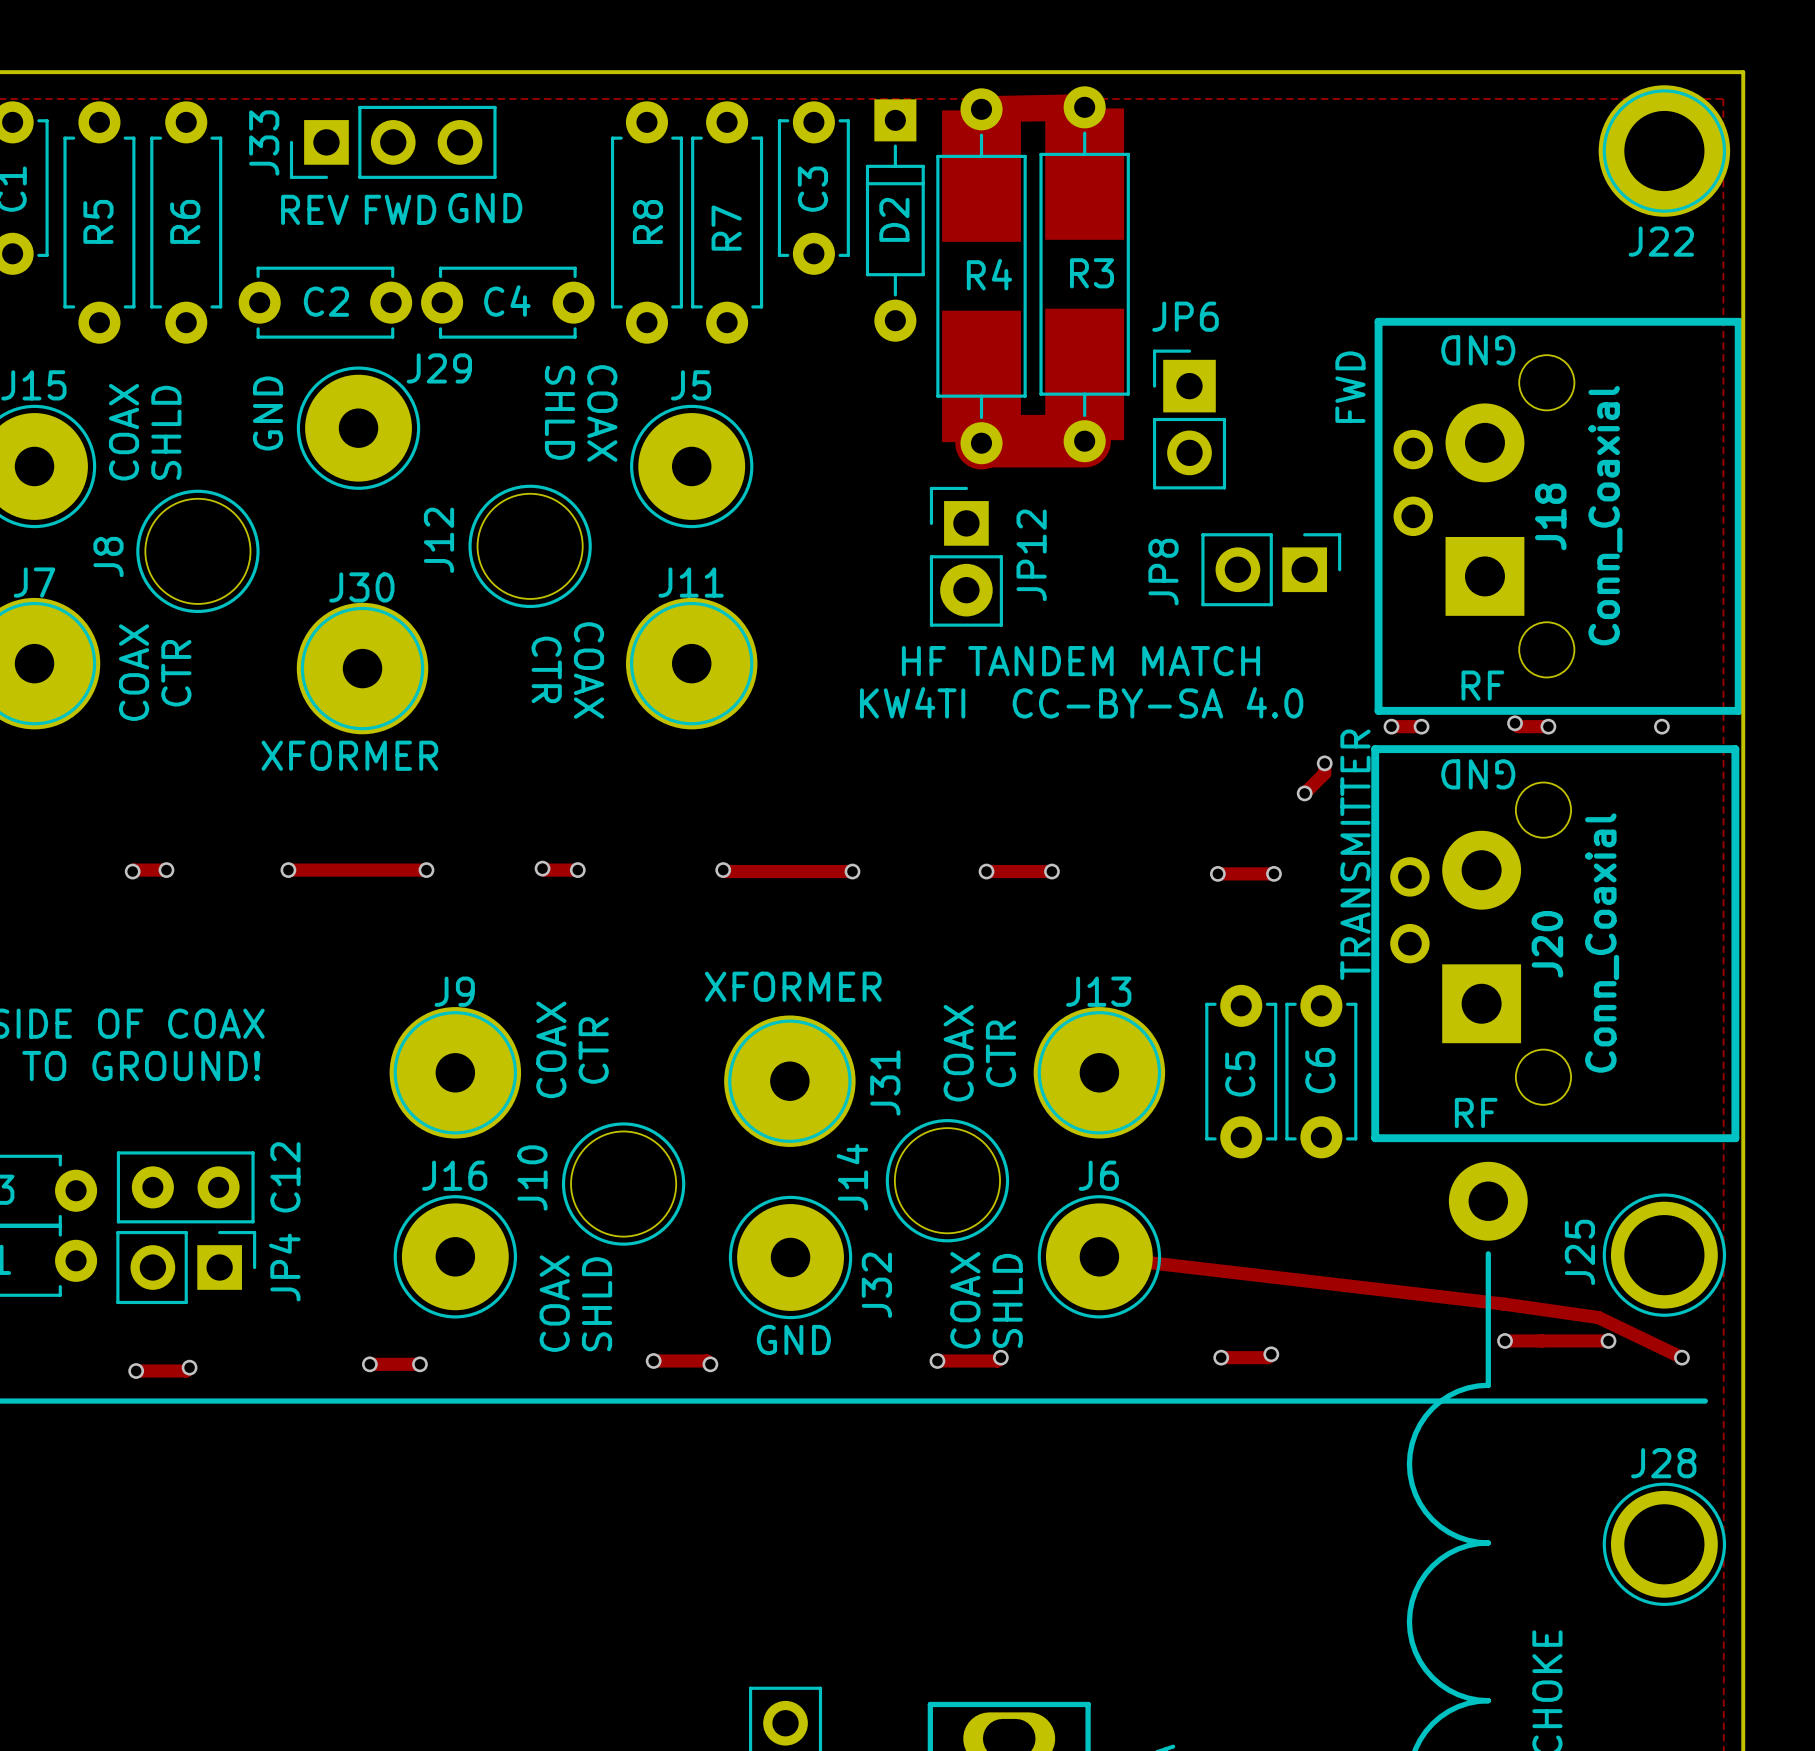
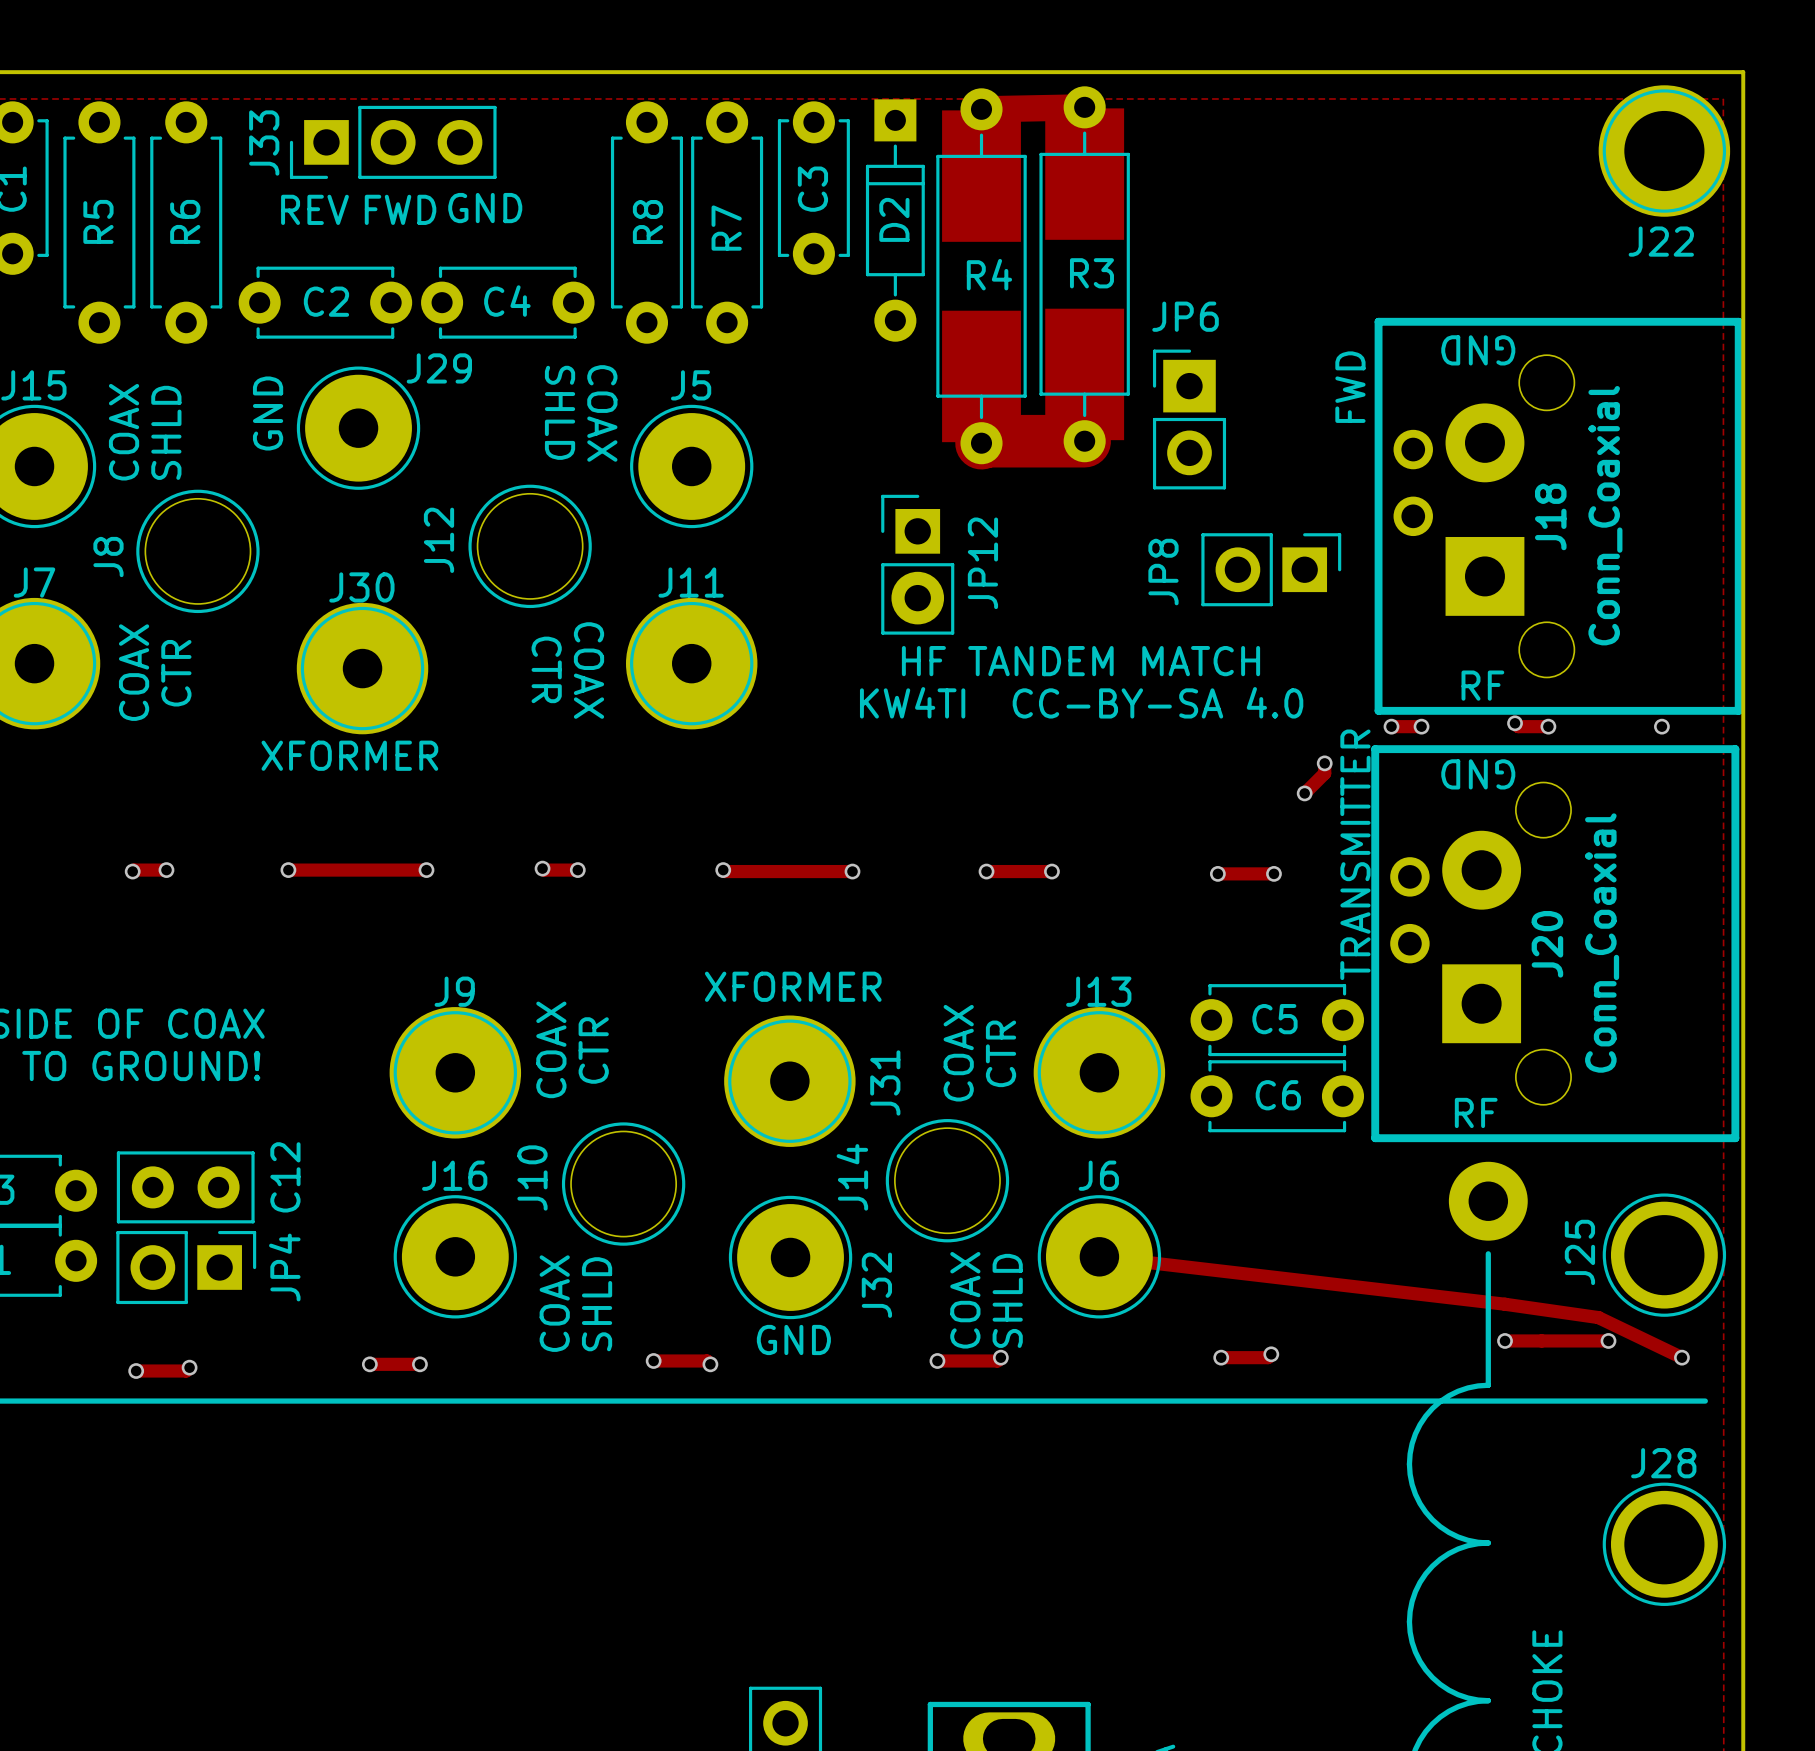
JP12 position: (966, 556) -> (917, 564)
C5 rotation: 0° (1241, 1071) -> 90° clockwise (1277, 1020)
C6 rotation: 0° (1321, 1071) -> 90° clockwise (1277, 1096)

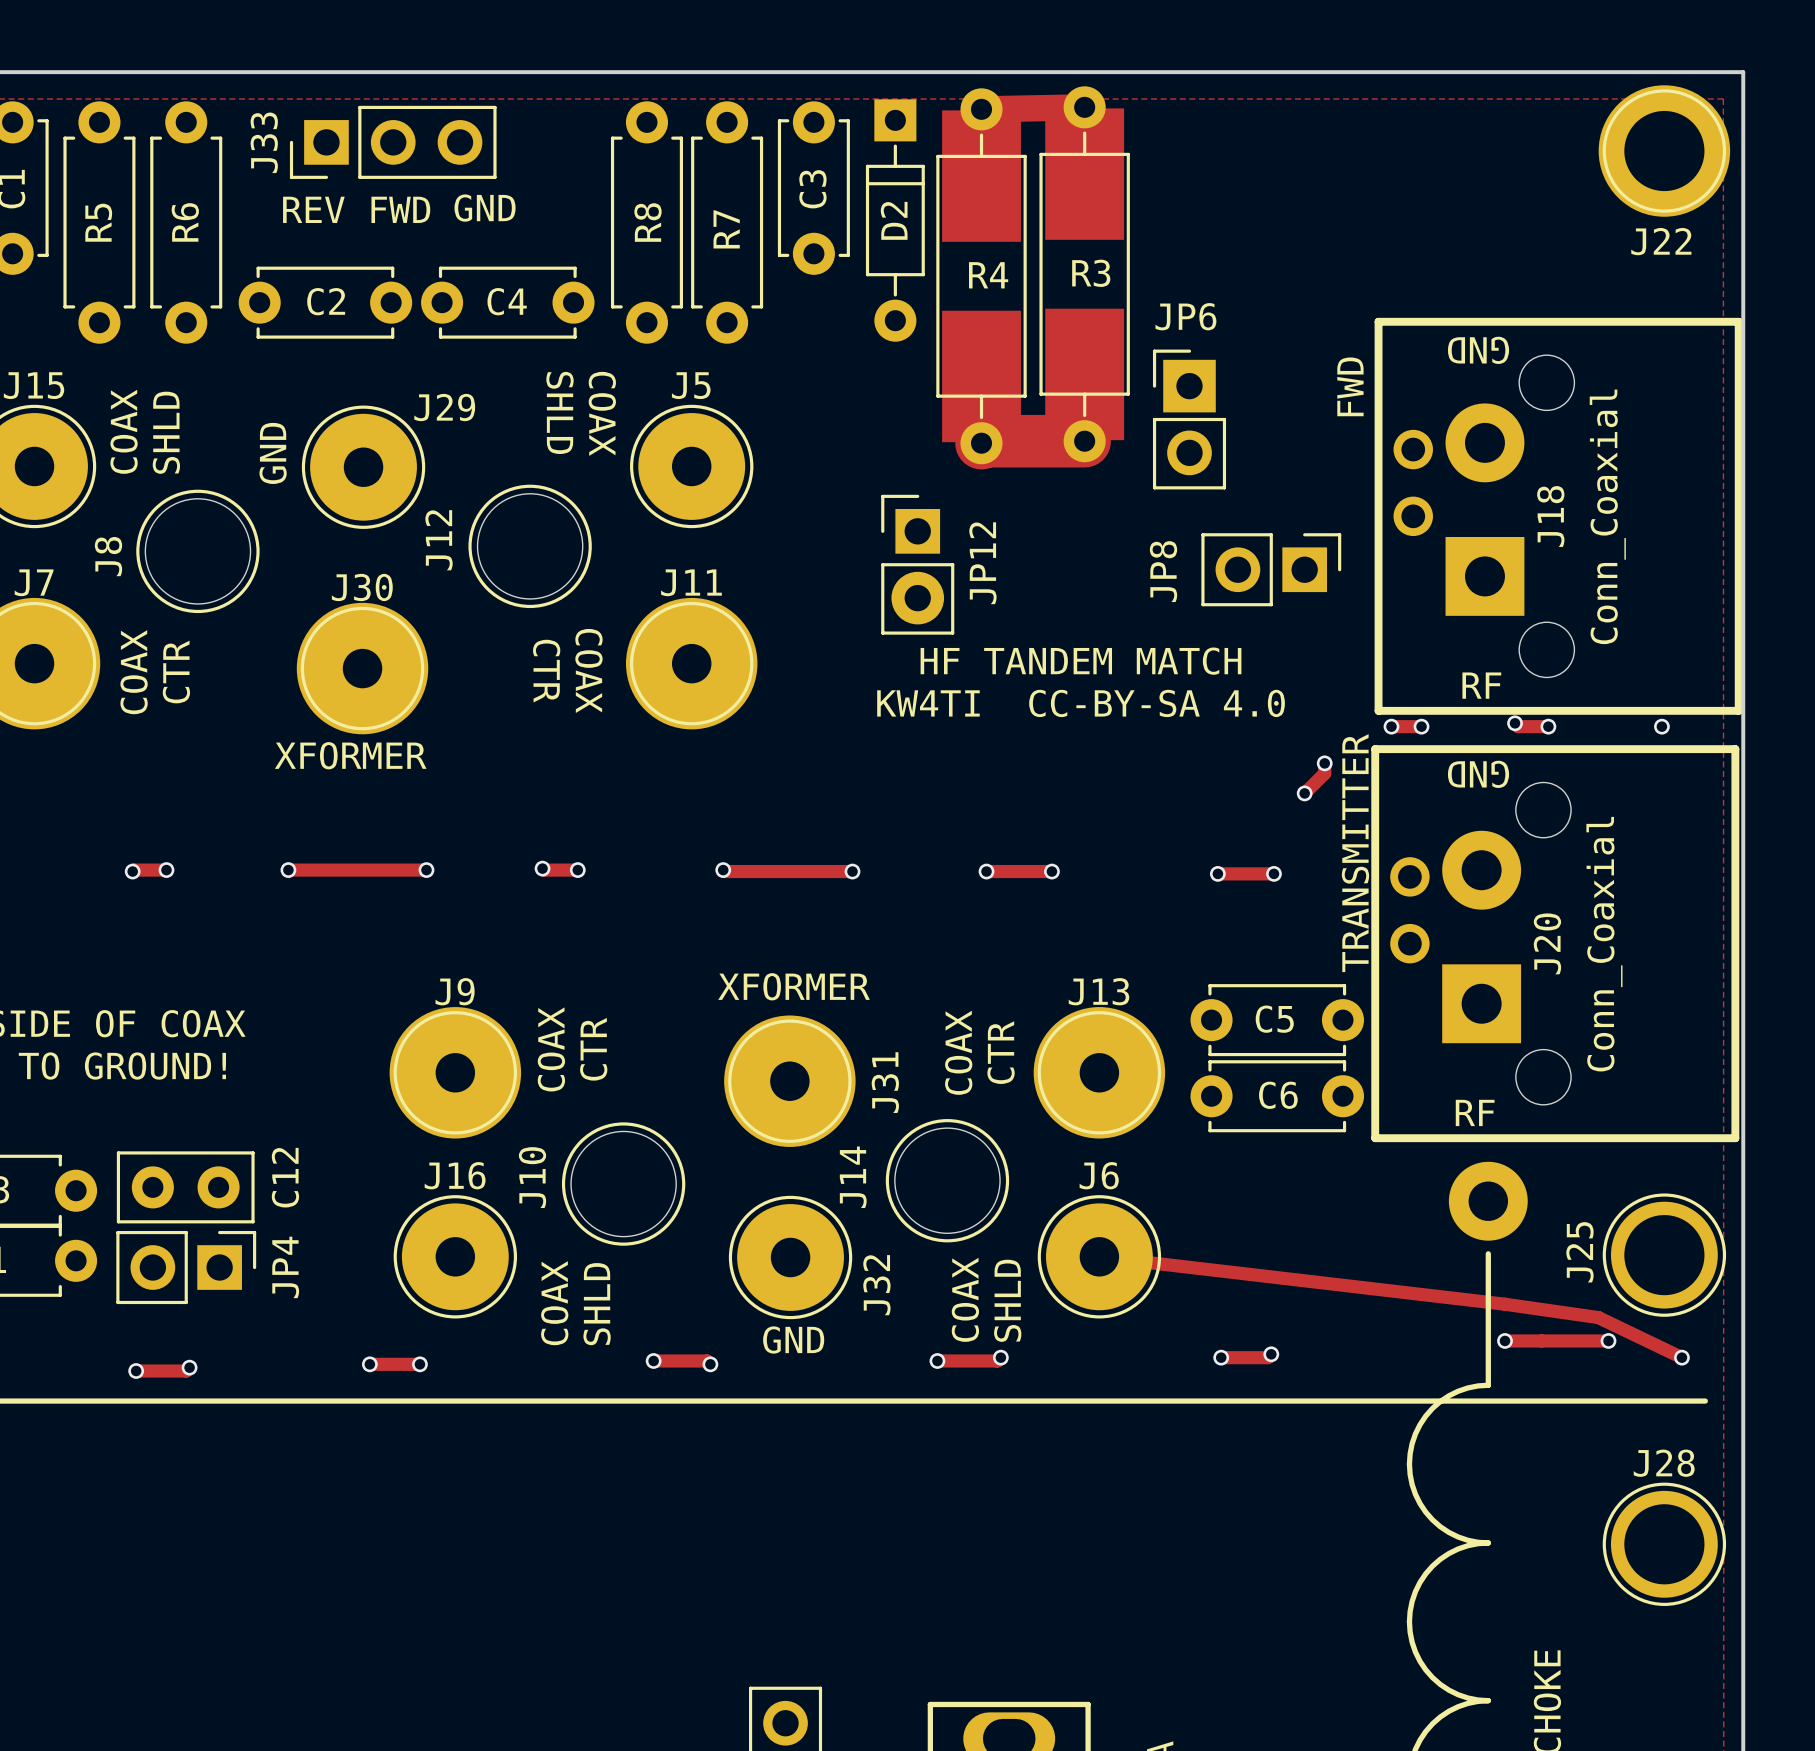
text position: GND (268, 413) -> GND (273, 453)
J29 position: (358, 428) -> (363, 467)

